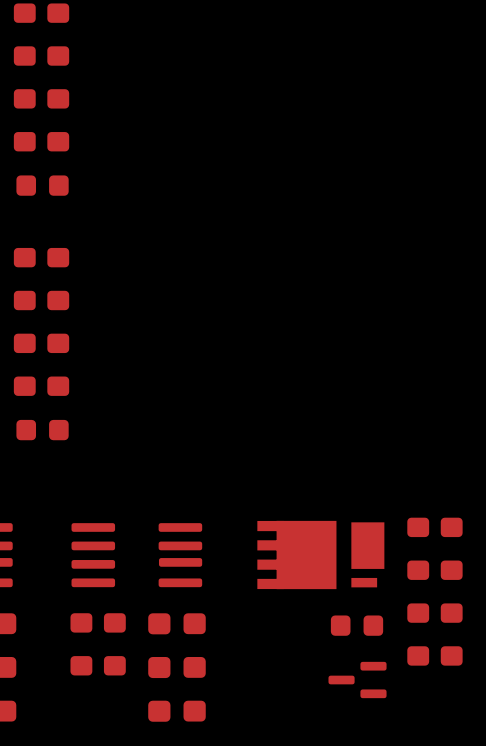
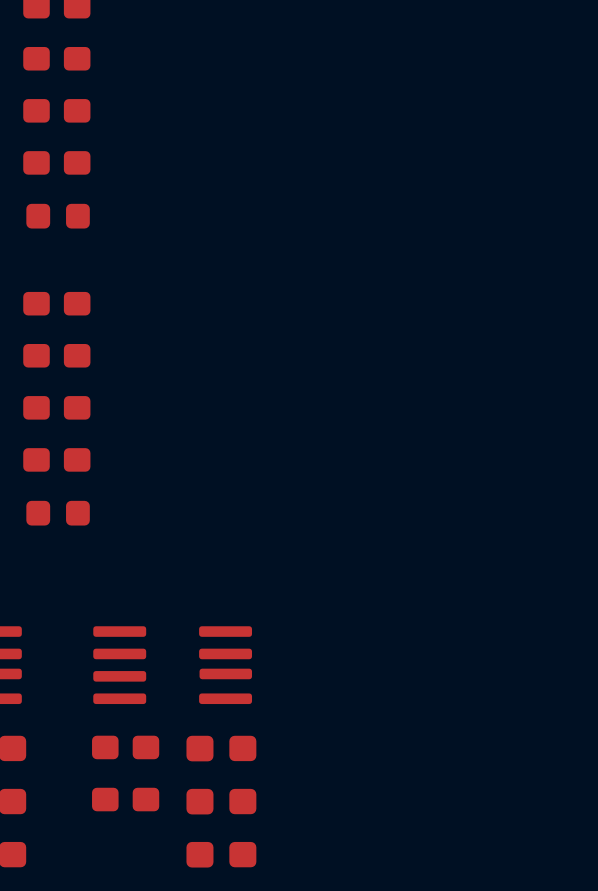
part: (434, 527) -> none
part: (320, 555) -> none
part: (434, 570) -> none
part: (434, 613) -> none
part: (357, 625) -> none
part: (434, 655) -> none
part: (357, 680) -> none

